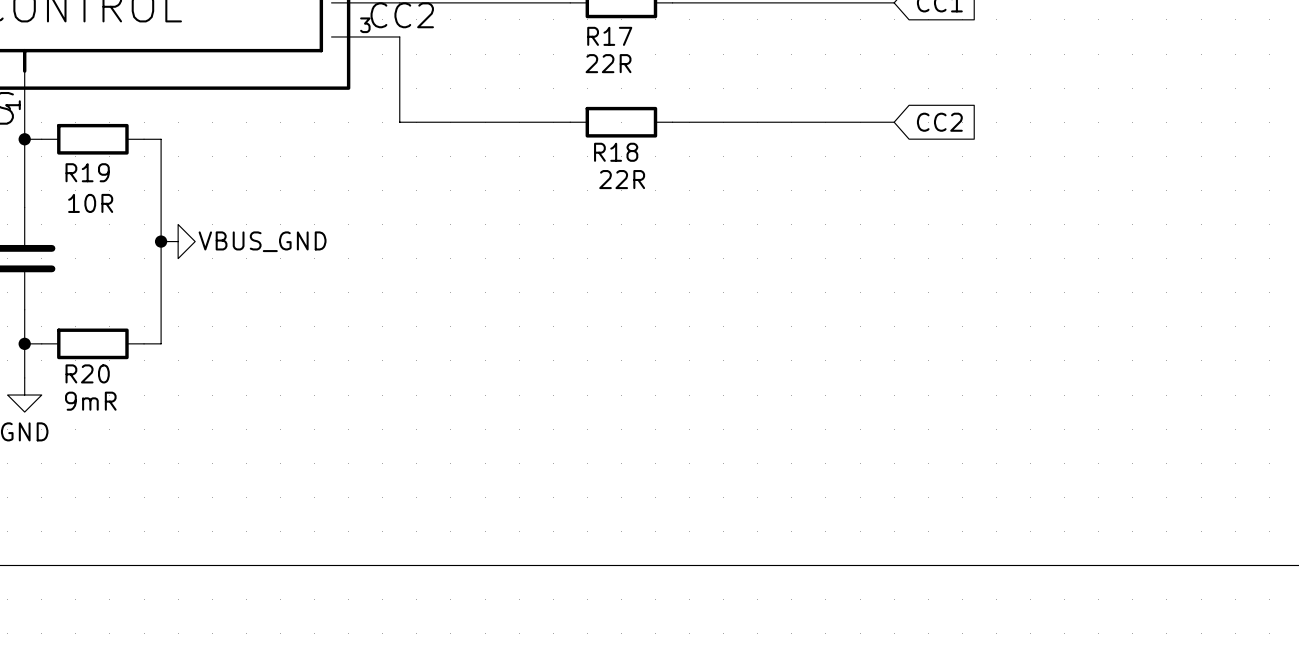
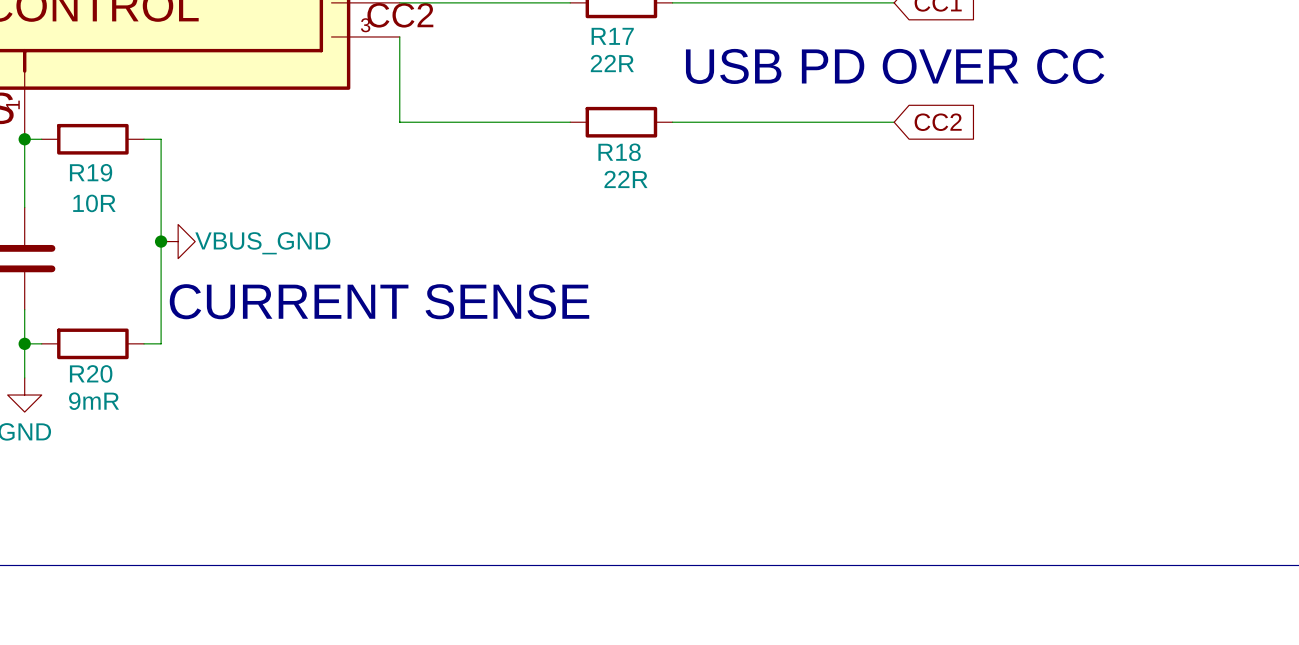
text: none -> USB PD OVER CC (895, 66)
text: none -> CURRENT SENSE (379, 301)

